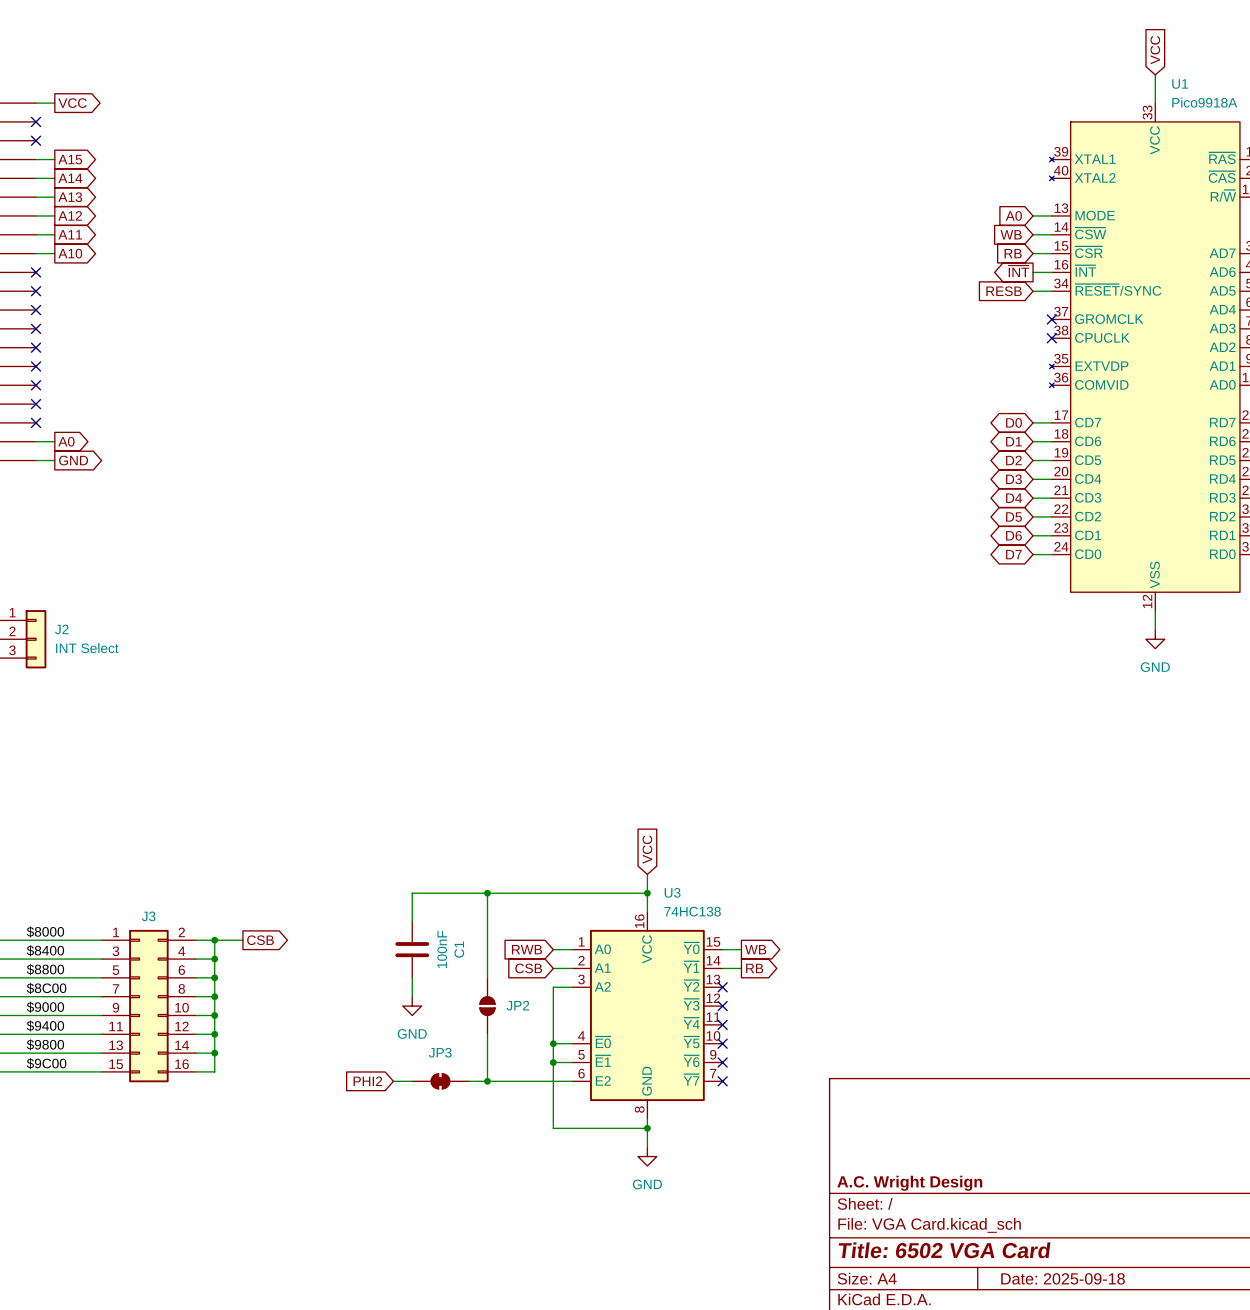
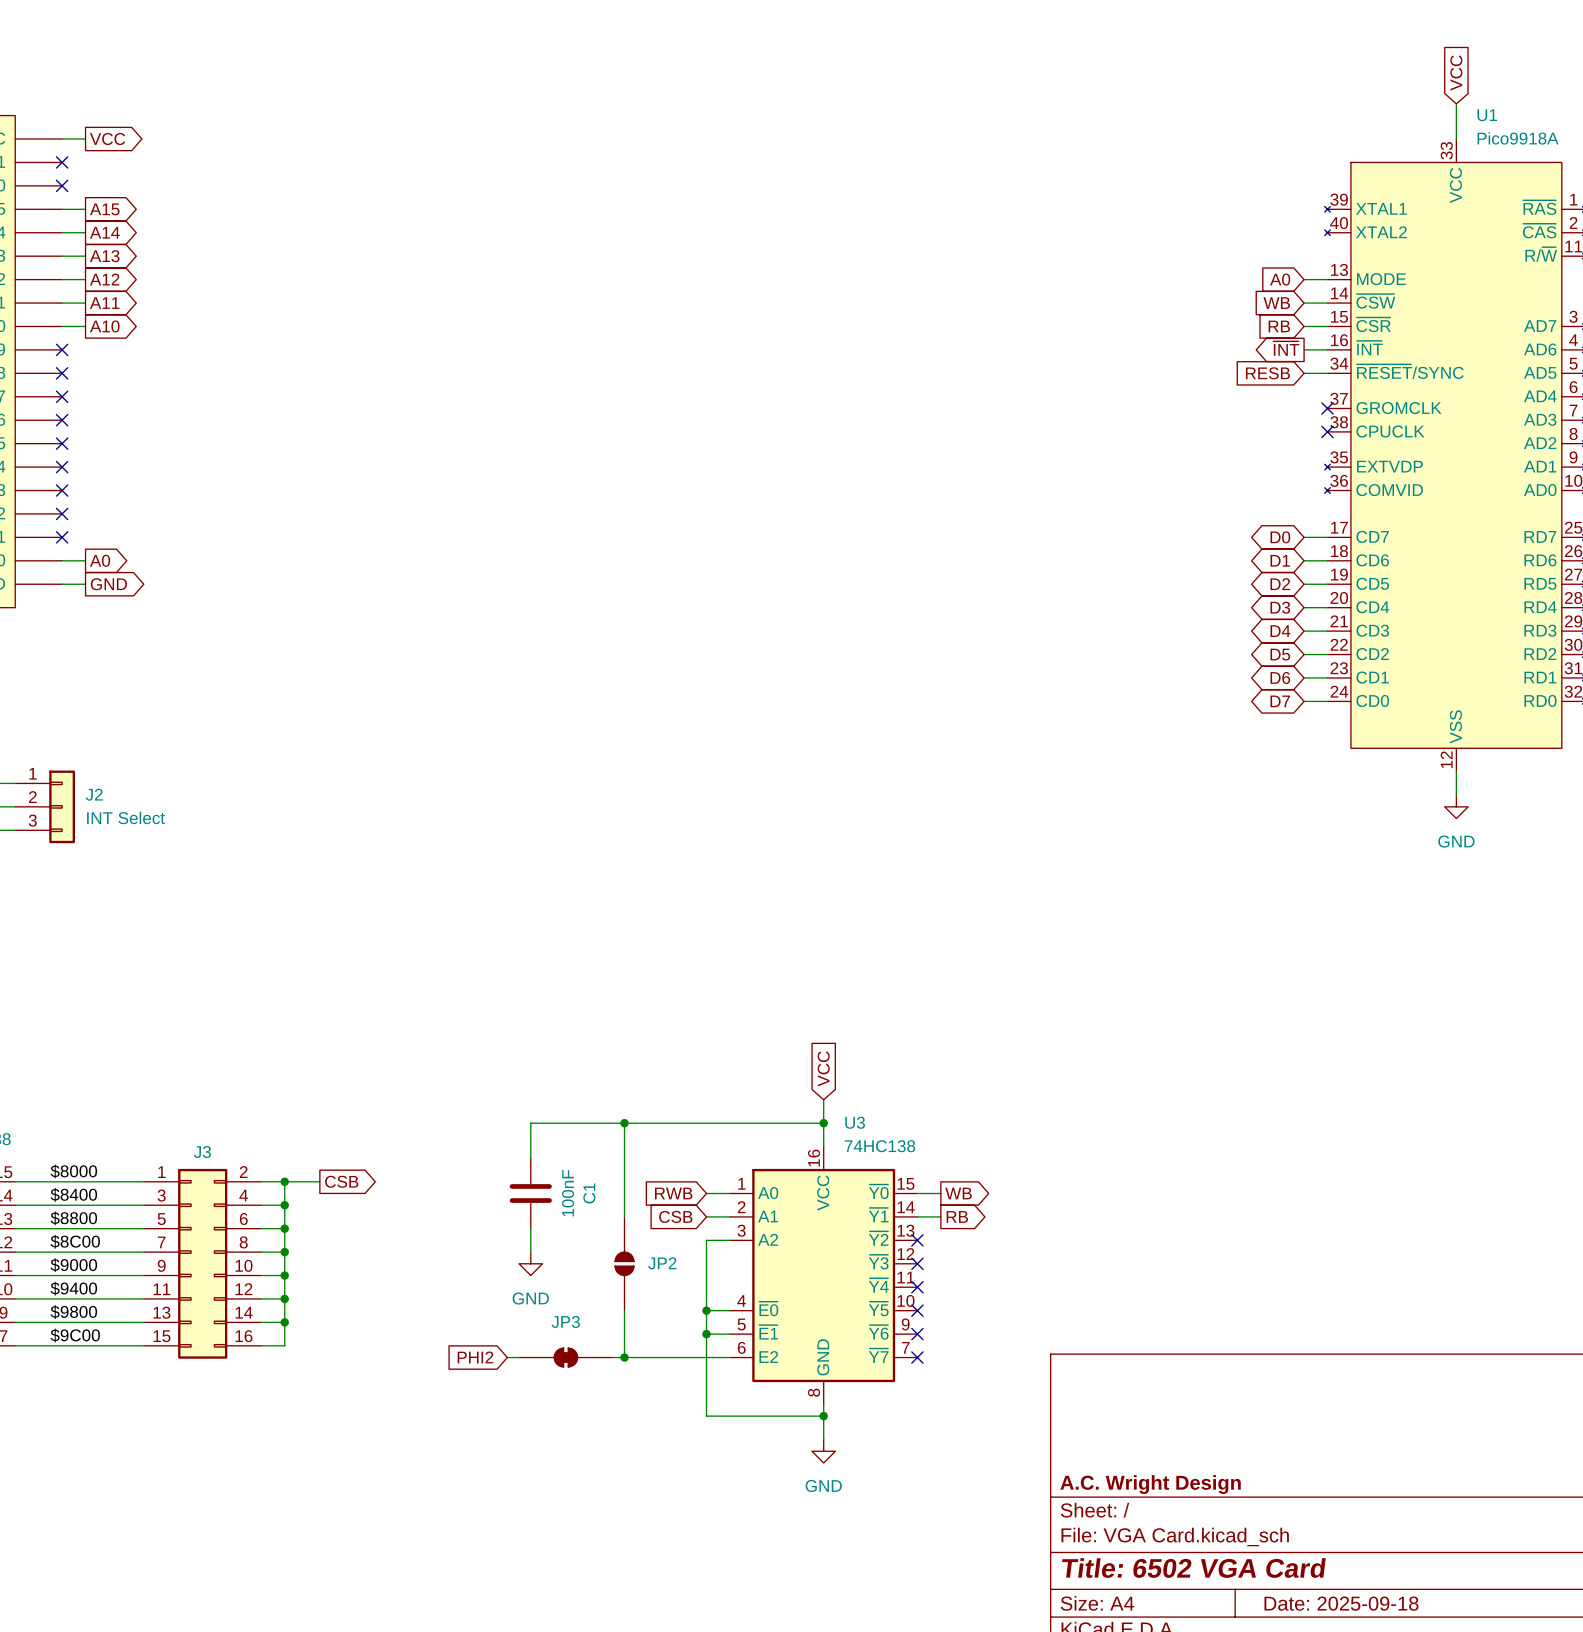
JP2 symbol: [479, 977, 496, 1035] -> [614, 1216, 635, 1311]
JP3 symbol: [412, 1073, 469, 1089] -> [519, 1347, 613, 1368]

